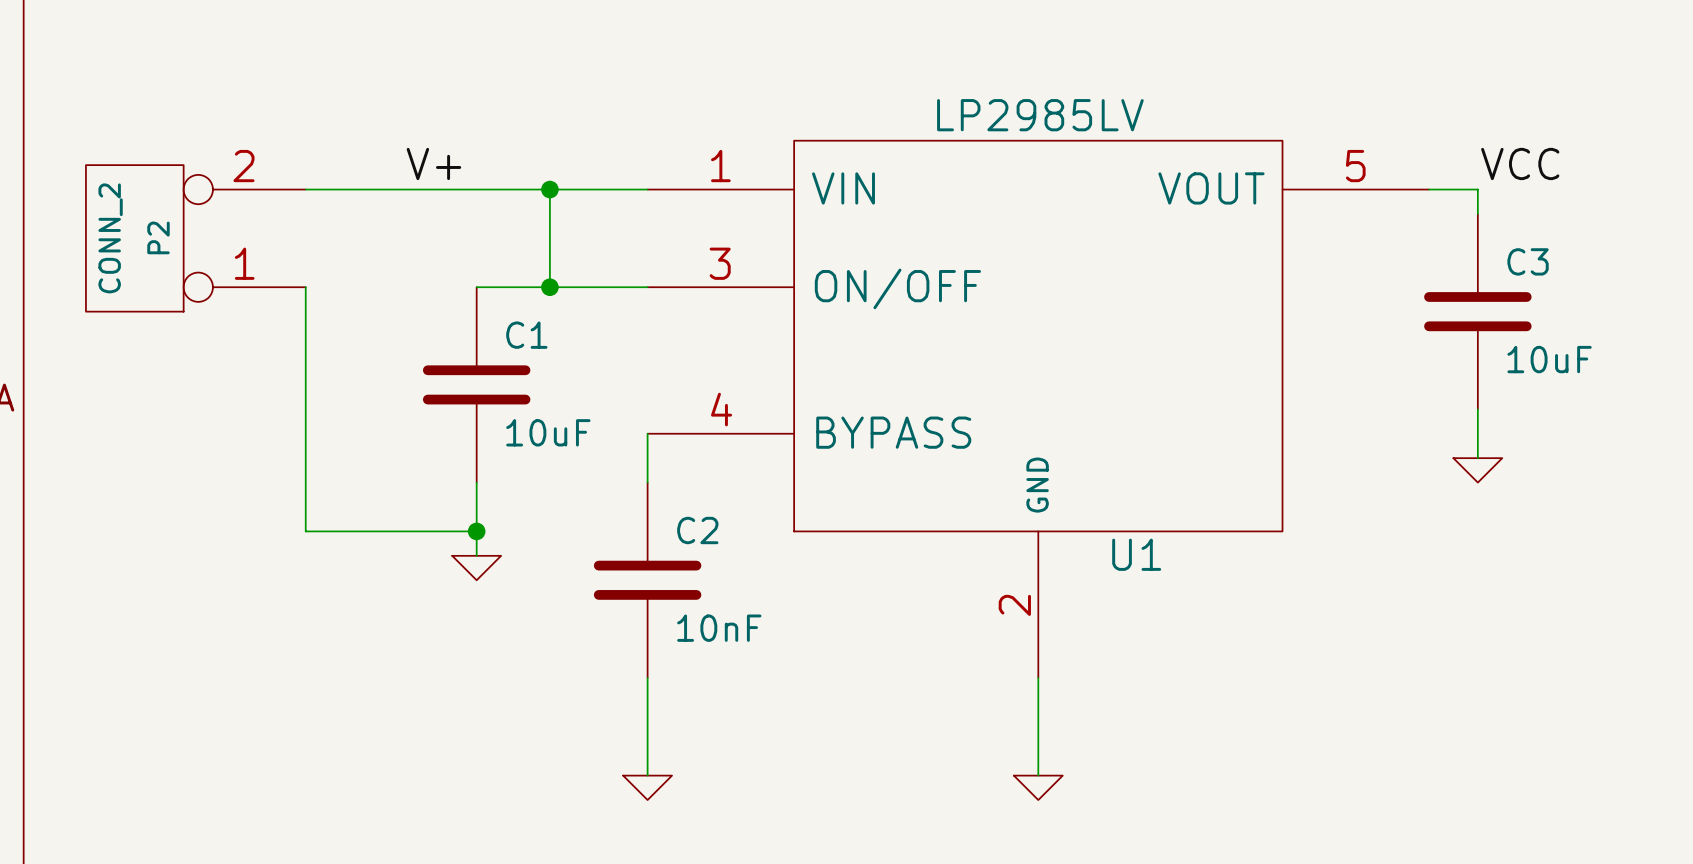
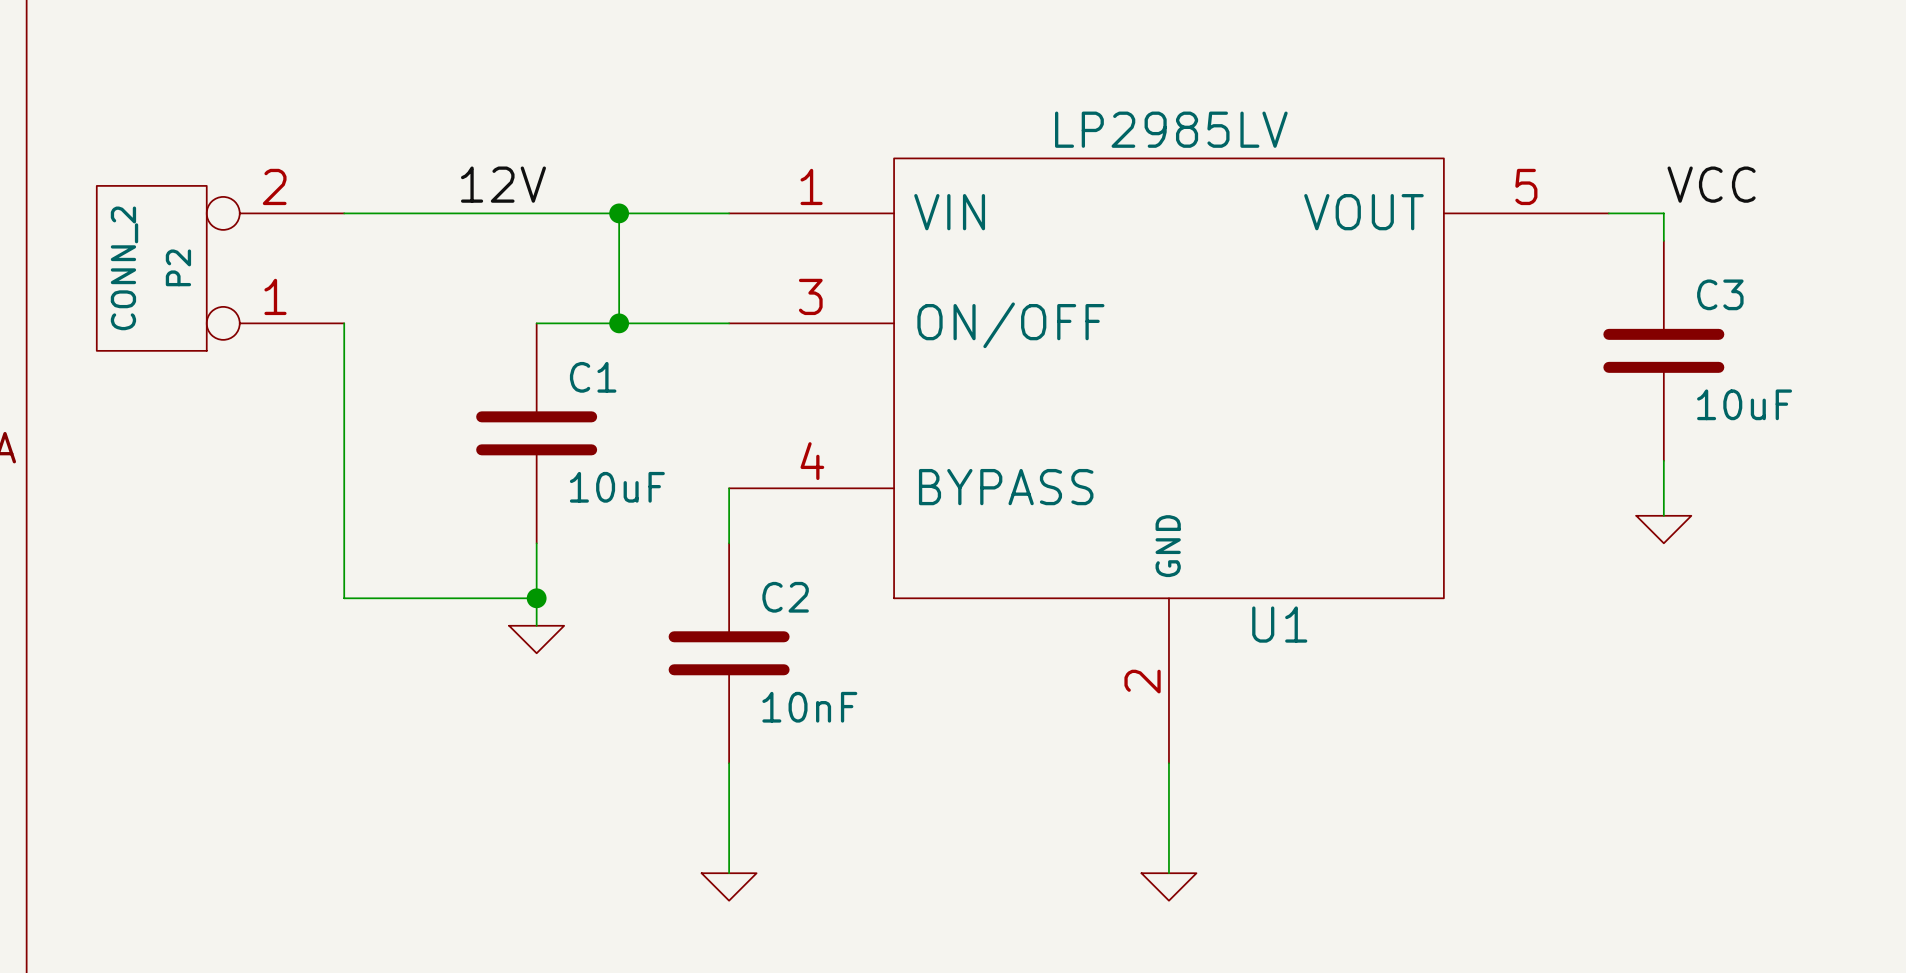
label: V+ (433, 163) -> 12V (503, 184)

